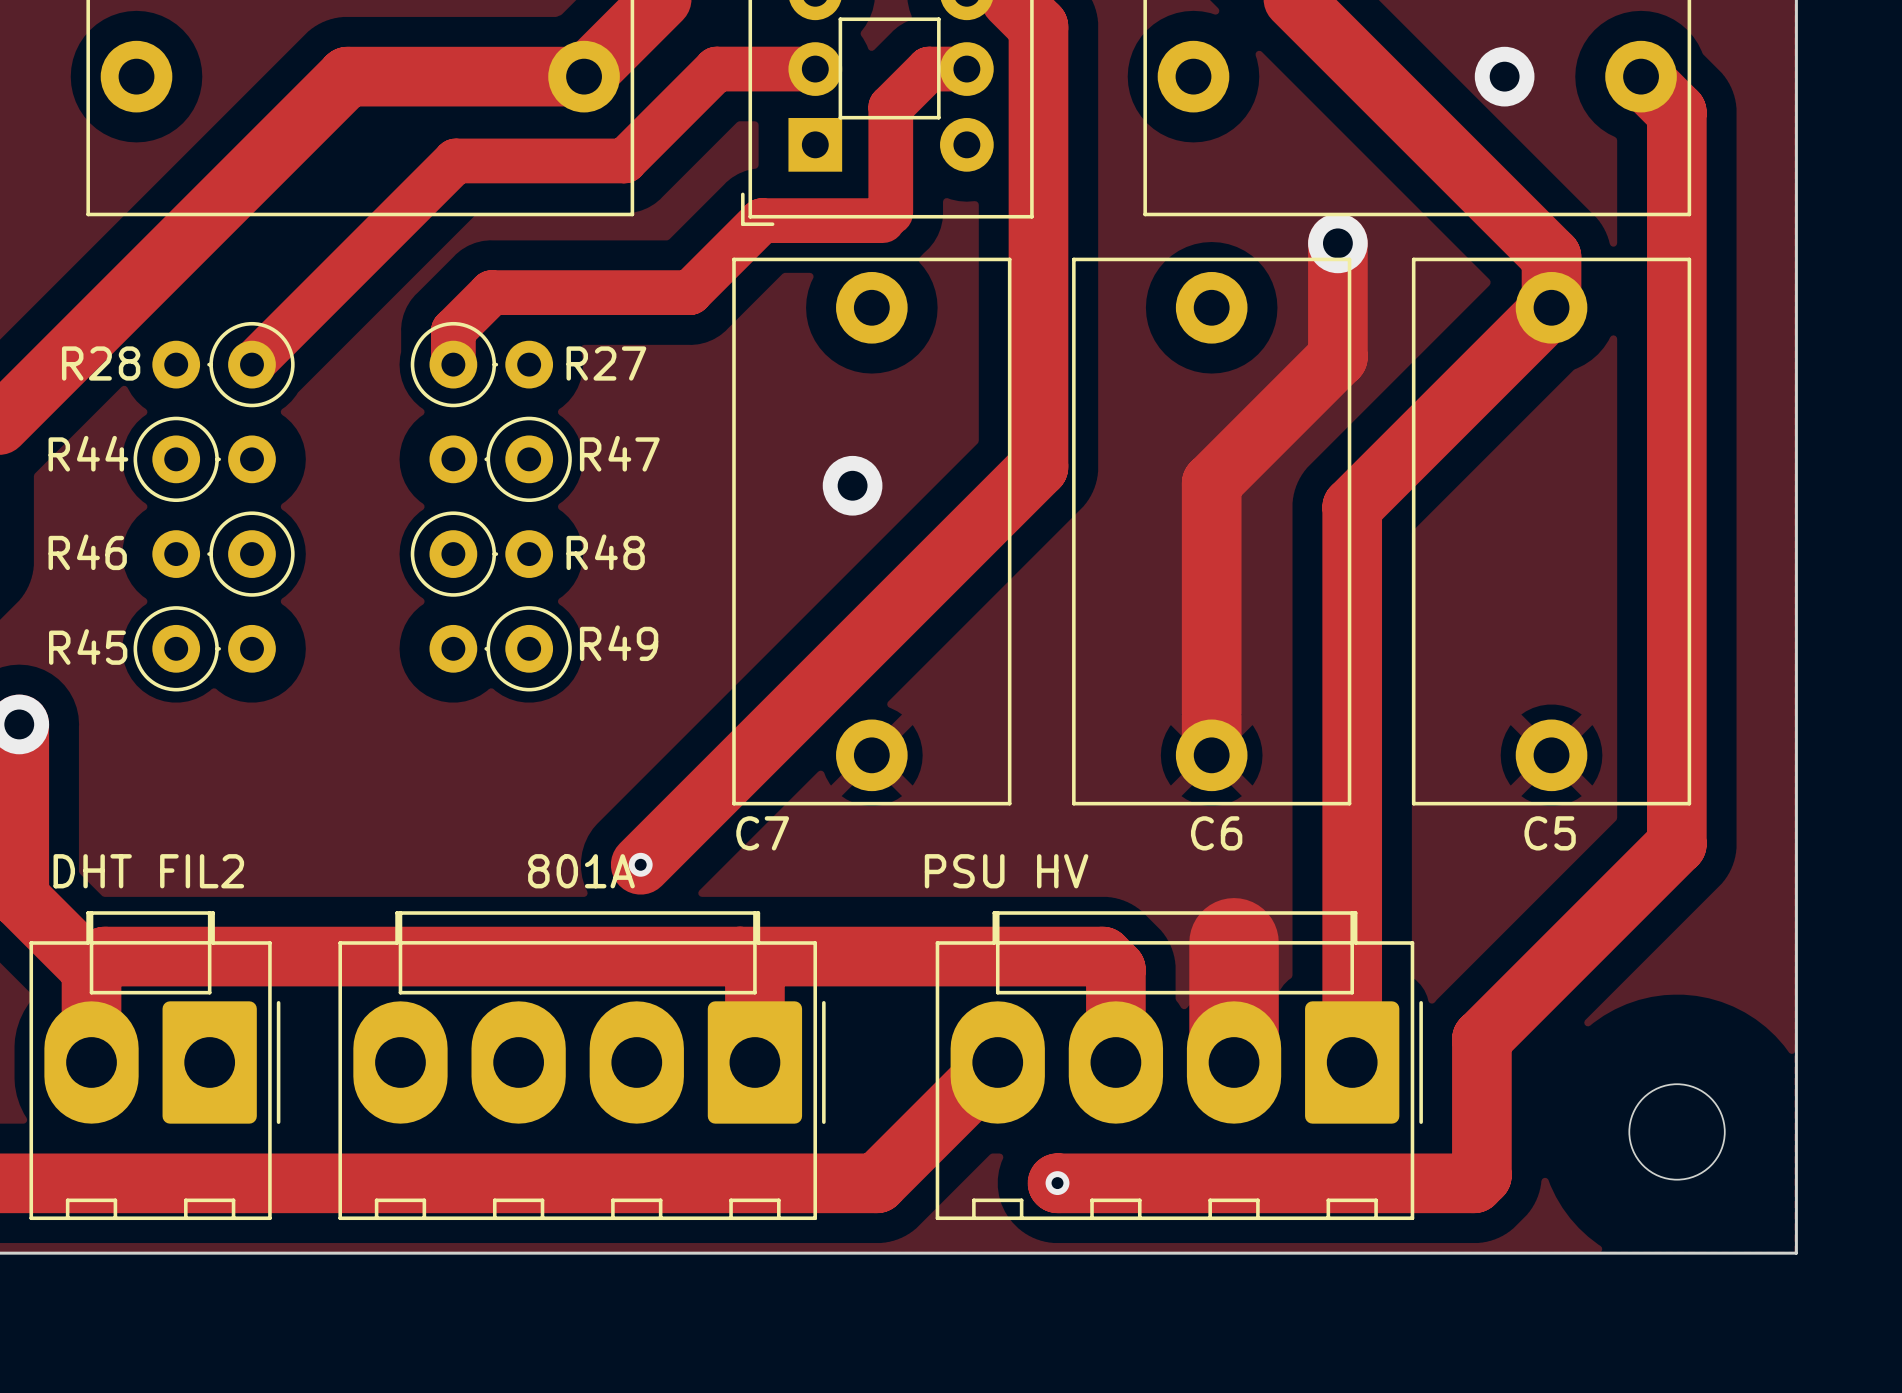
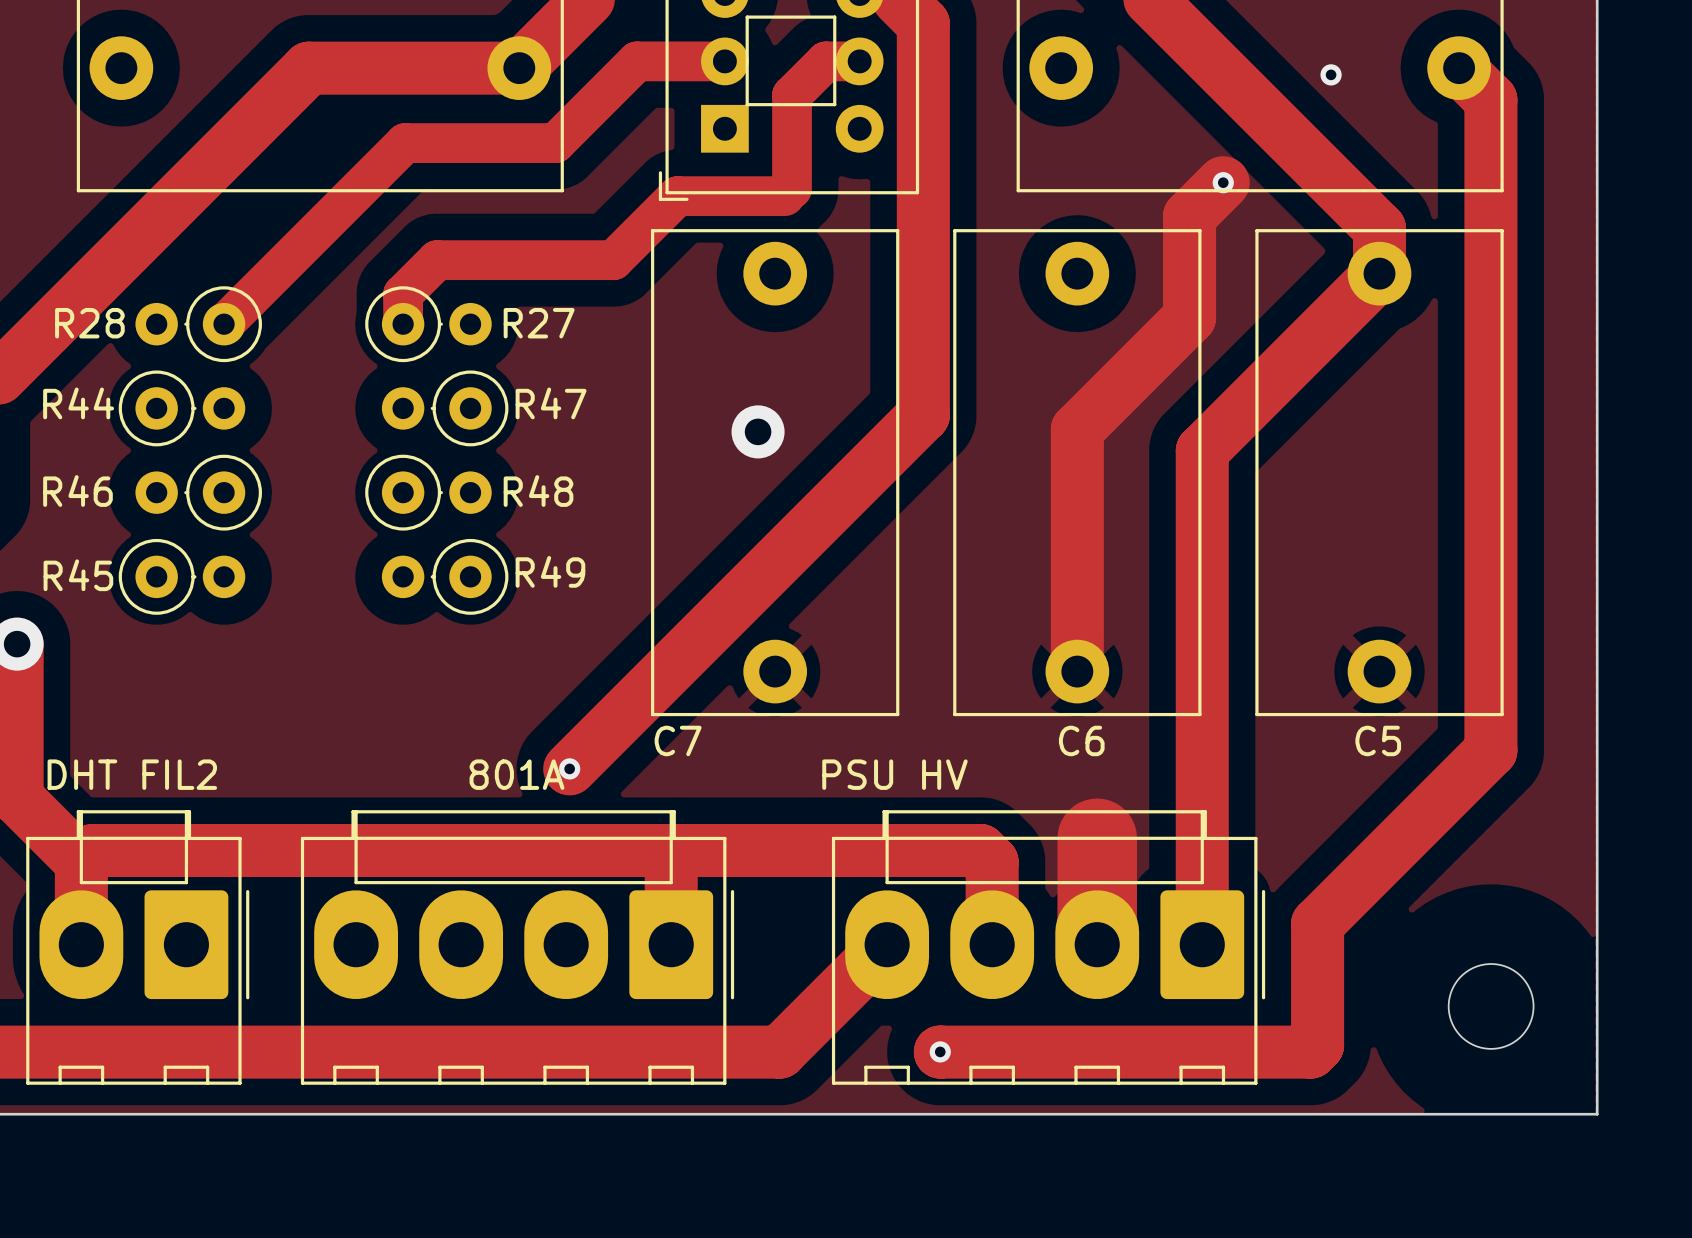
via size: [1474, 46, 1535, 107] -> [1320, 64, 1342, 86]
track: none -> (1223, 182) (1189, 216)
via: none -> (1223, 182)
via: (1337, 243) -> none

